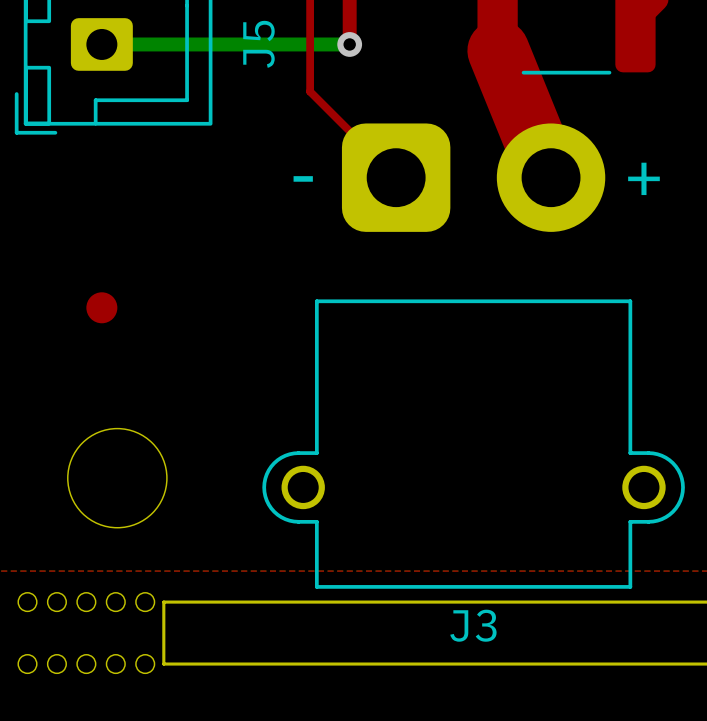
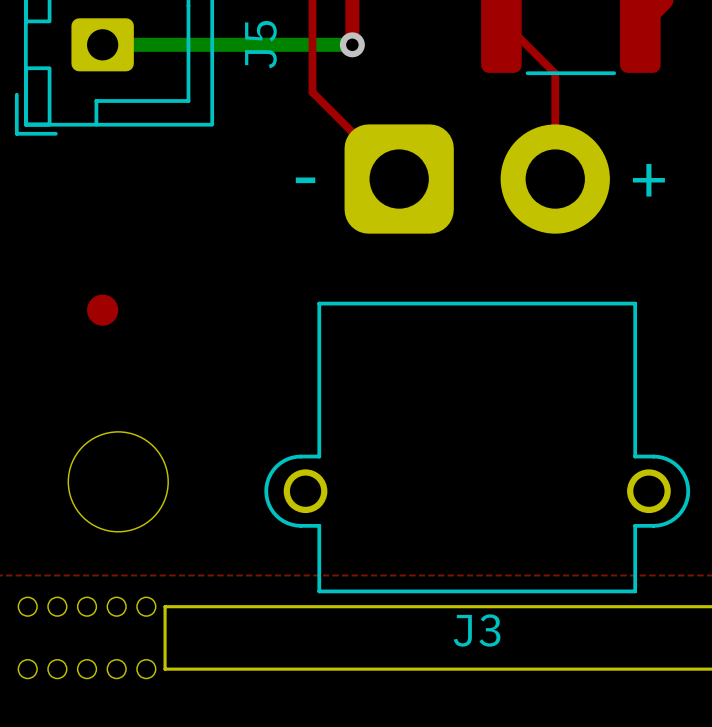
top track: none -> (501, 19) (555, 73) (555, 179)
top track: (498, 50) (538, 149) -> none

